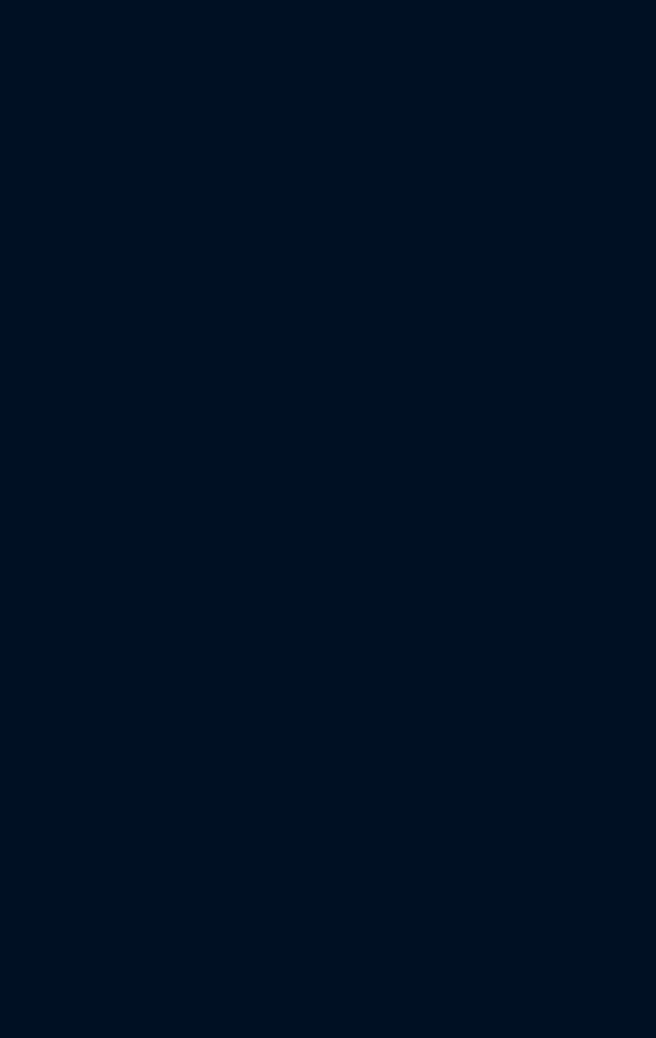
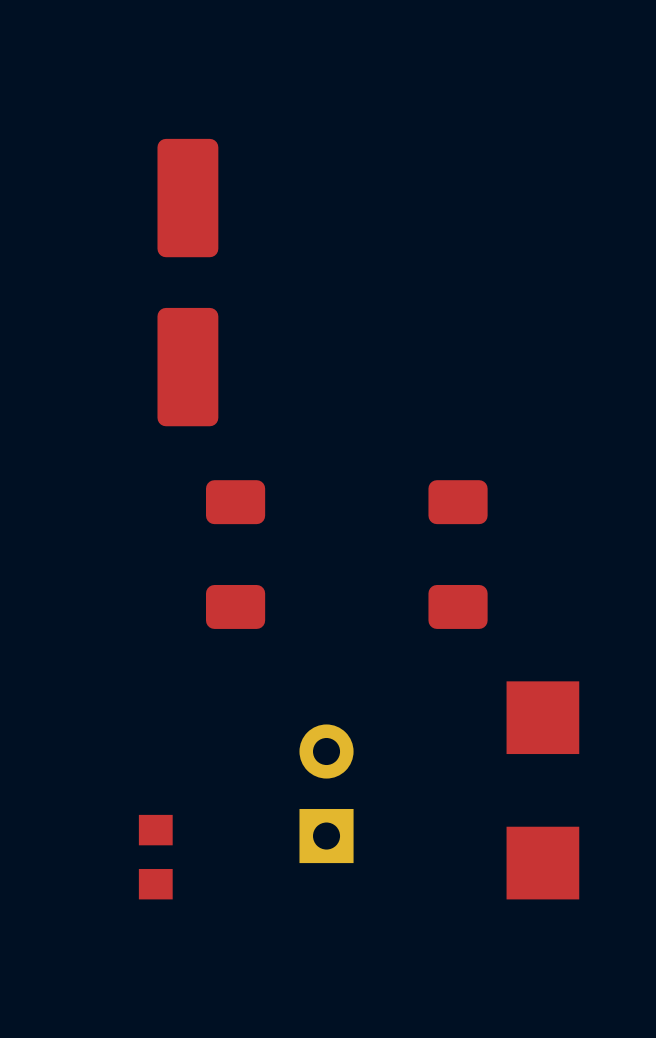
part: none -> (187, 282)
part: none -> (235, 554)
part: none -> (458, 554)
part: none -> (542, 790)
part: none -> (326, 793)
part: none -> (155, 857)

